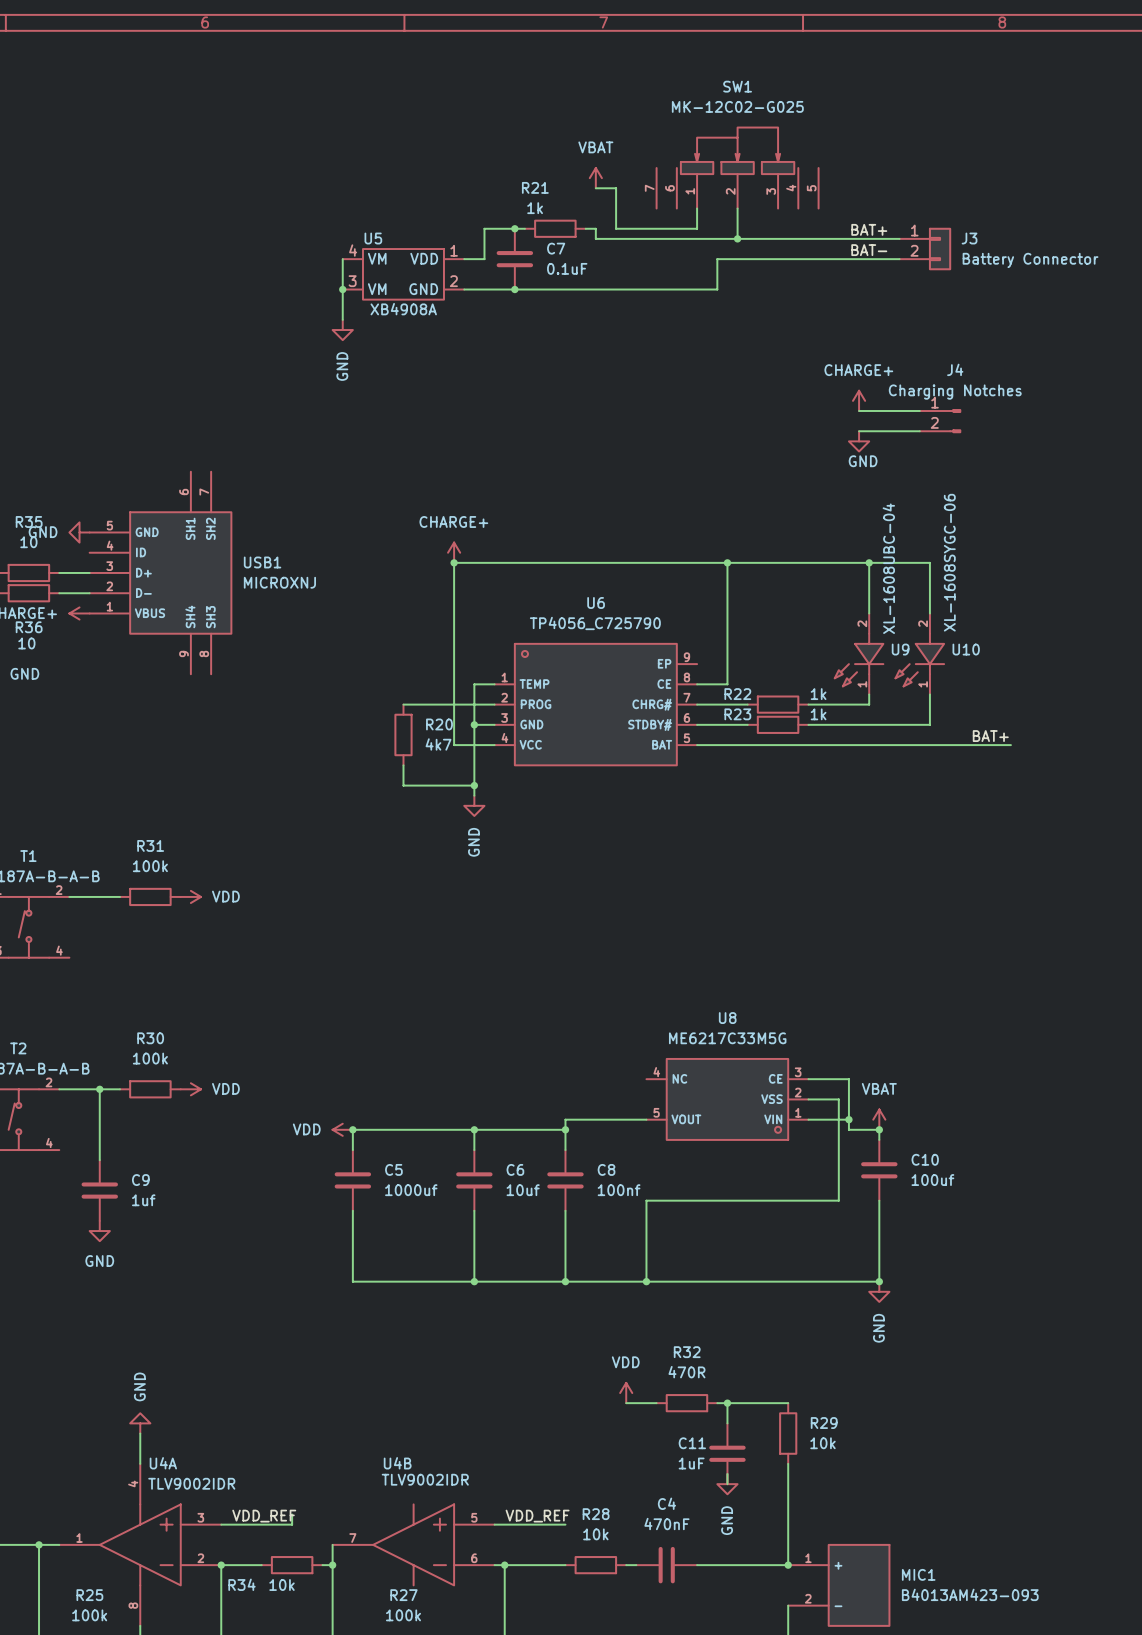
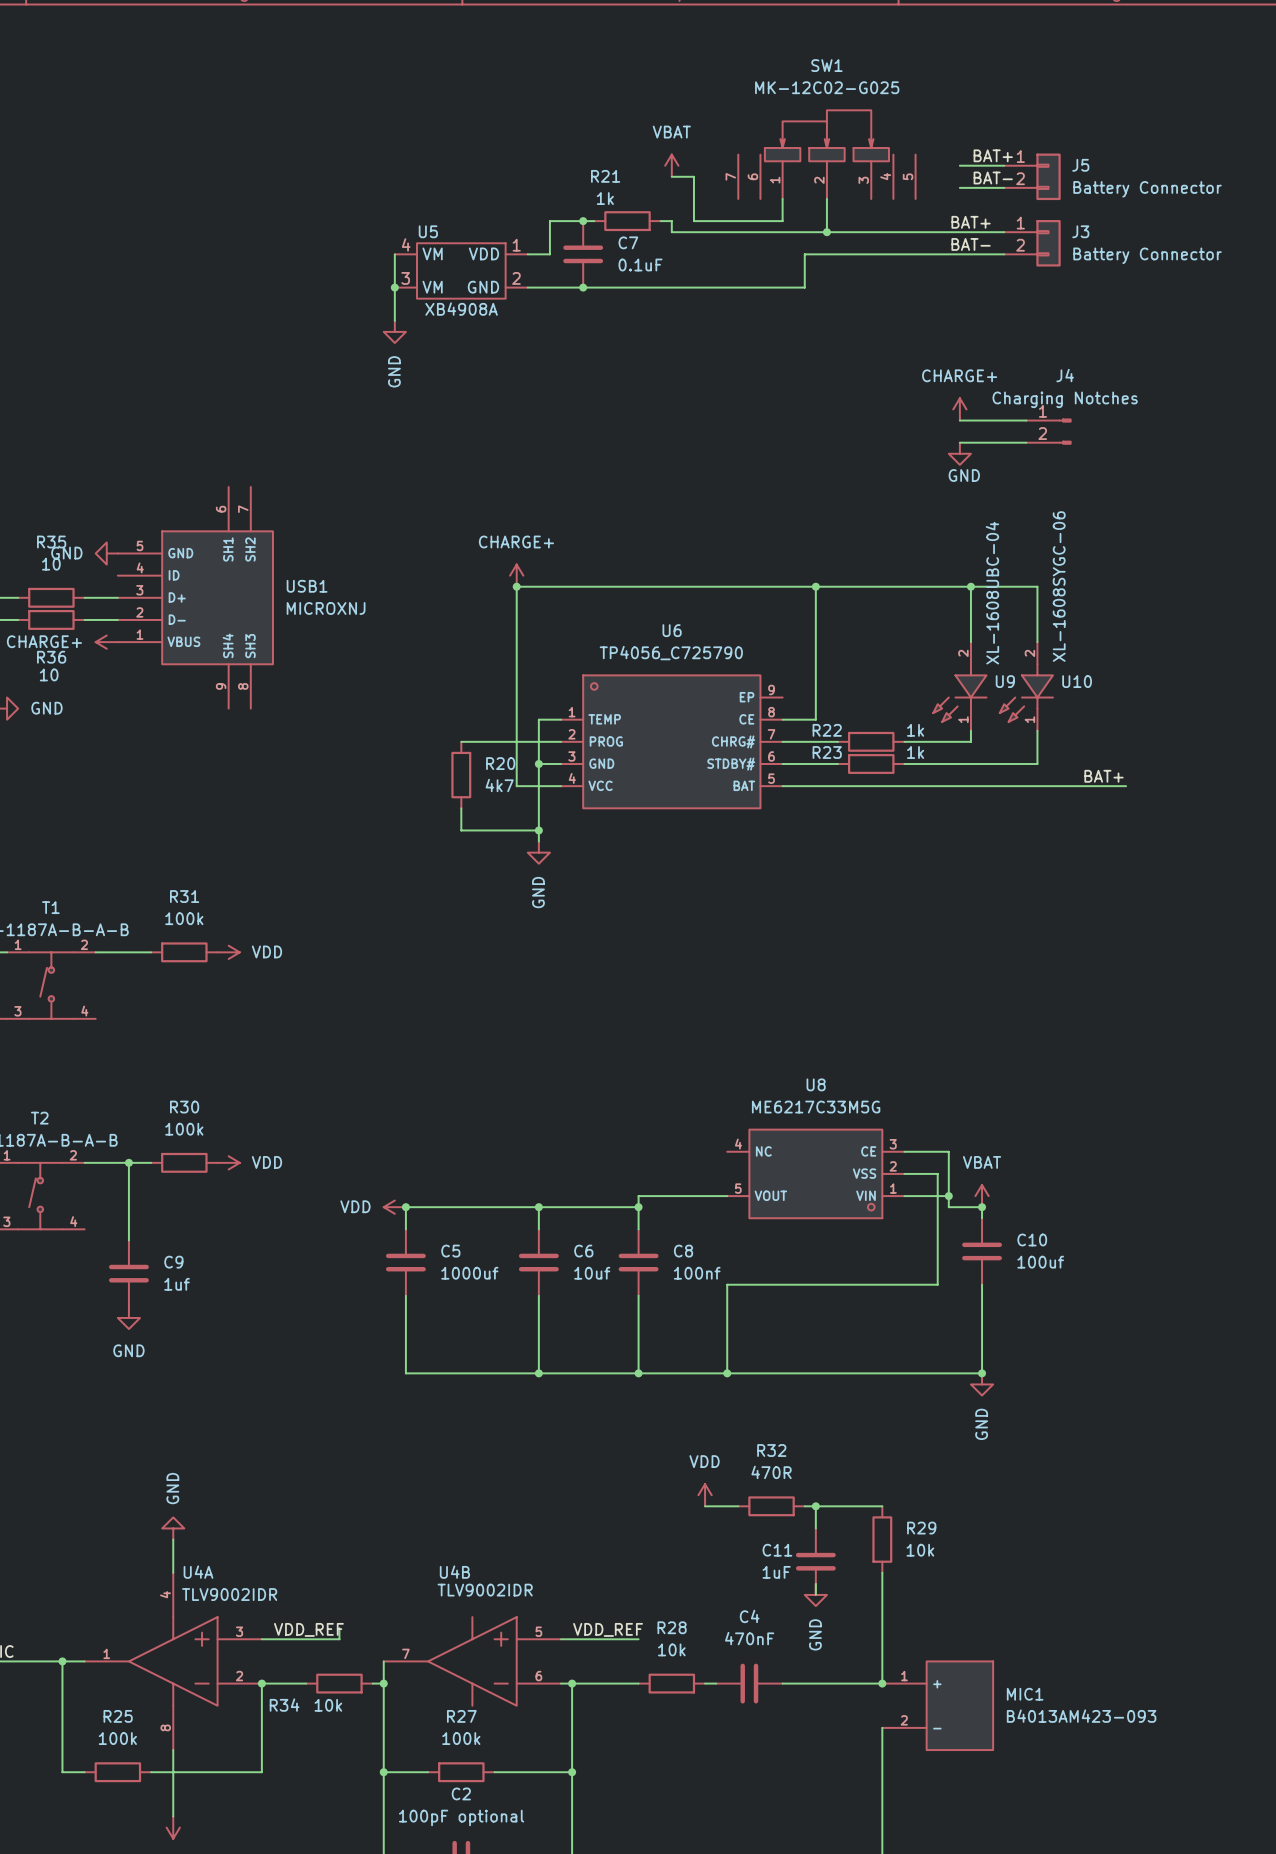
label: none -> BAT+ (993, 155)
wire: none -> (959, 165) (1004, 165)
J5: none -> Battery Connector (1032, 176)
label: none -> BAT- (993, 177)
wire: none -> (959, 187) (1004, 187)

